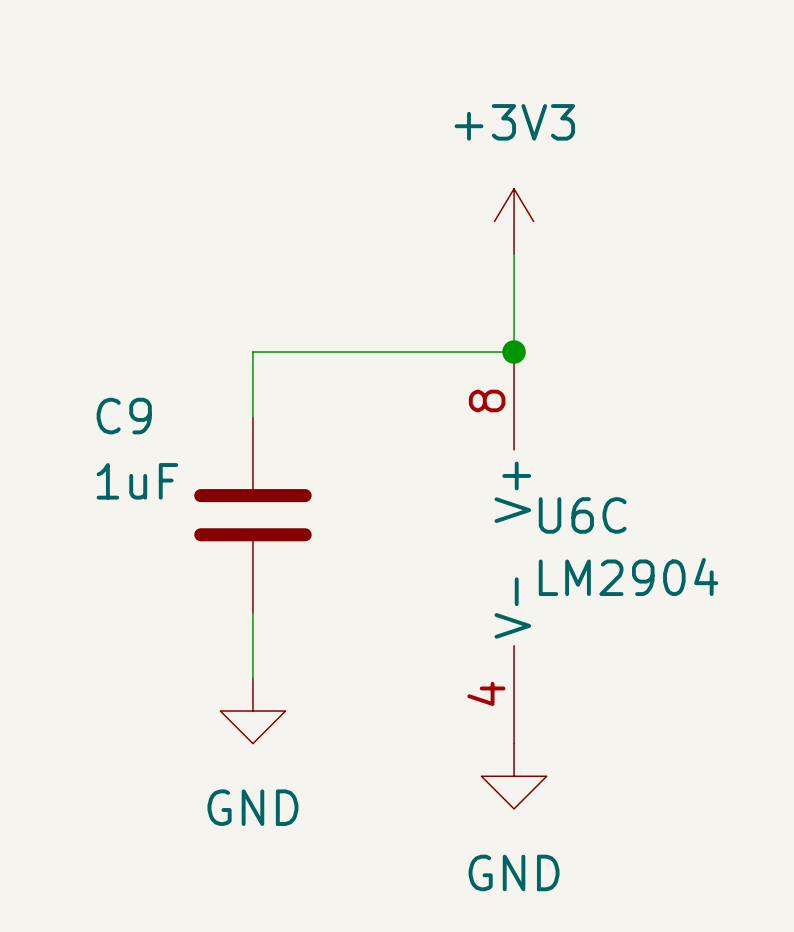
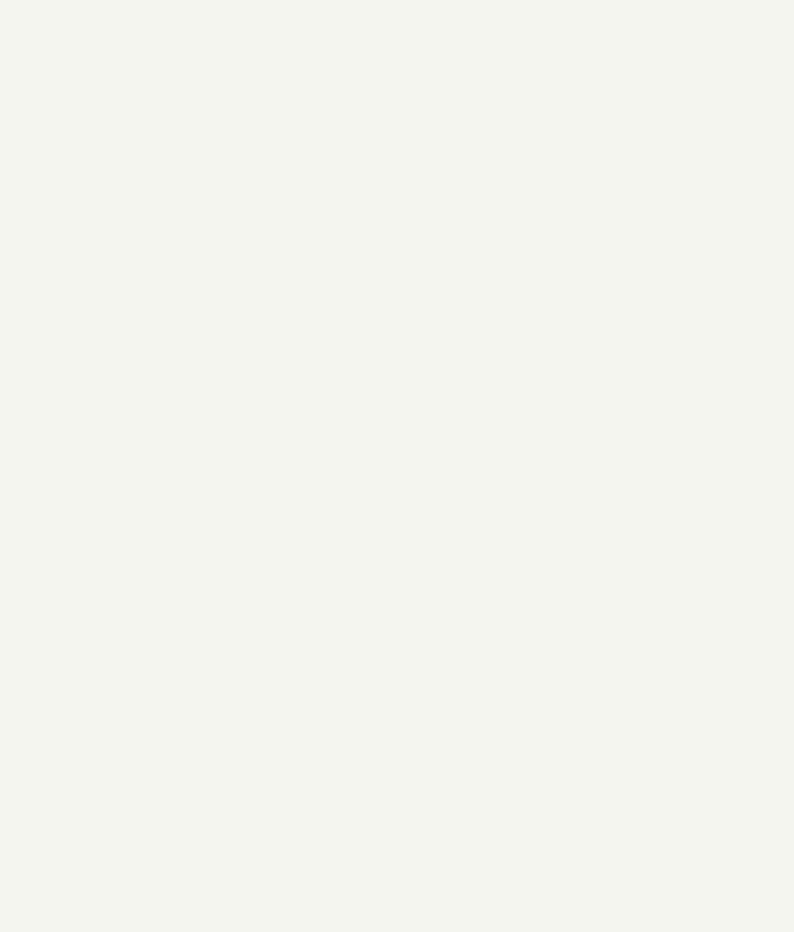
power symbol: +3V3 (514, 221) -> none
wire: (514, 254) (514, 352) (252, 352) (252, 417) -> none
junction: (514, 352) -> none
C9: 1uF (252, 515) -> none
U6C: LM2904 (514, 547) -> none
wire: (252, 613) (252, 678) -> none
power symbol: GND (252, 711) -> none
power symbol: GND (514, 776) -> none

